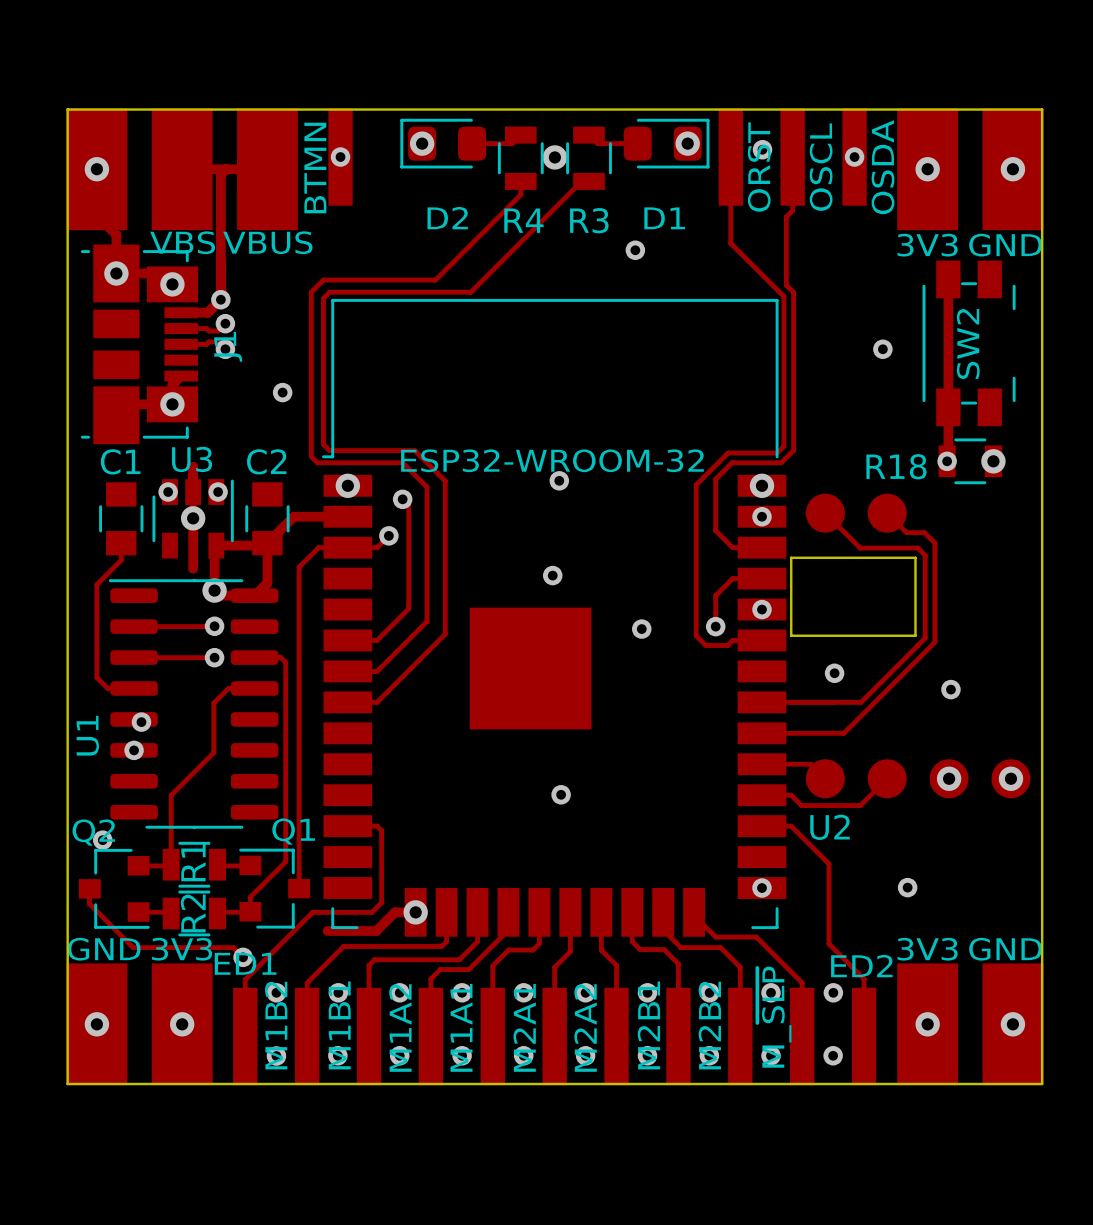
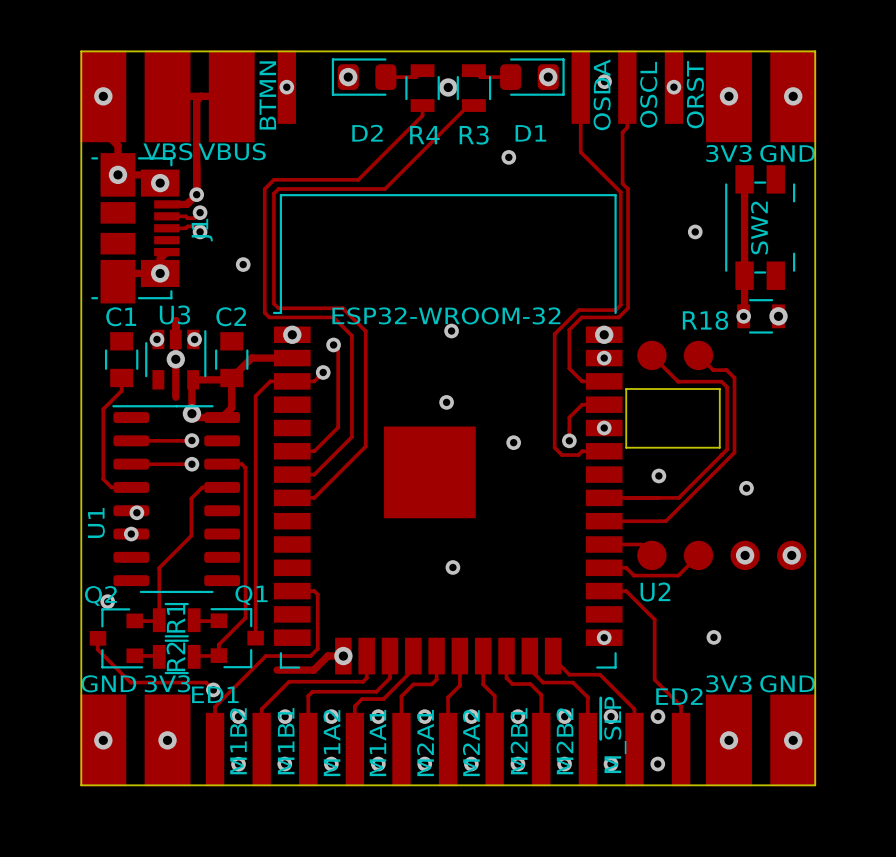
part value: ORST (759, 167) -> OSDA (602, 94)
part value: OSDA (883, 167) -> ORST (695, 94)

